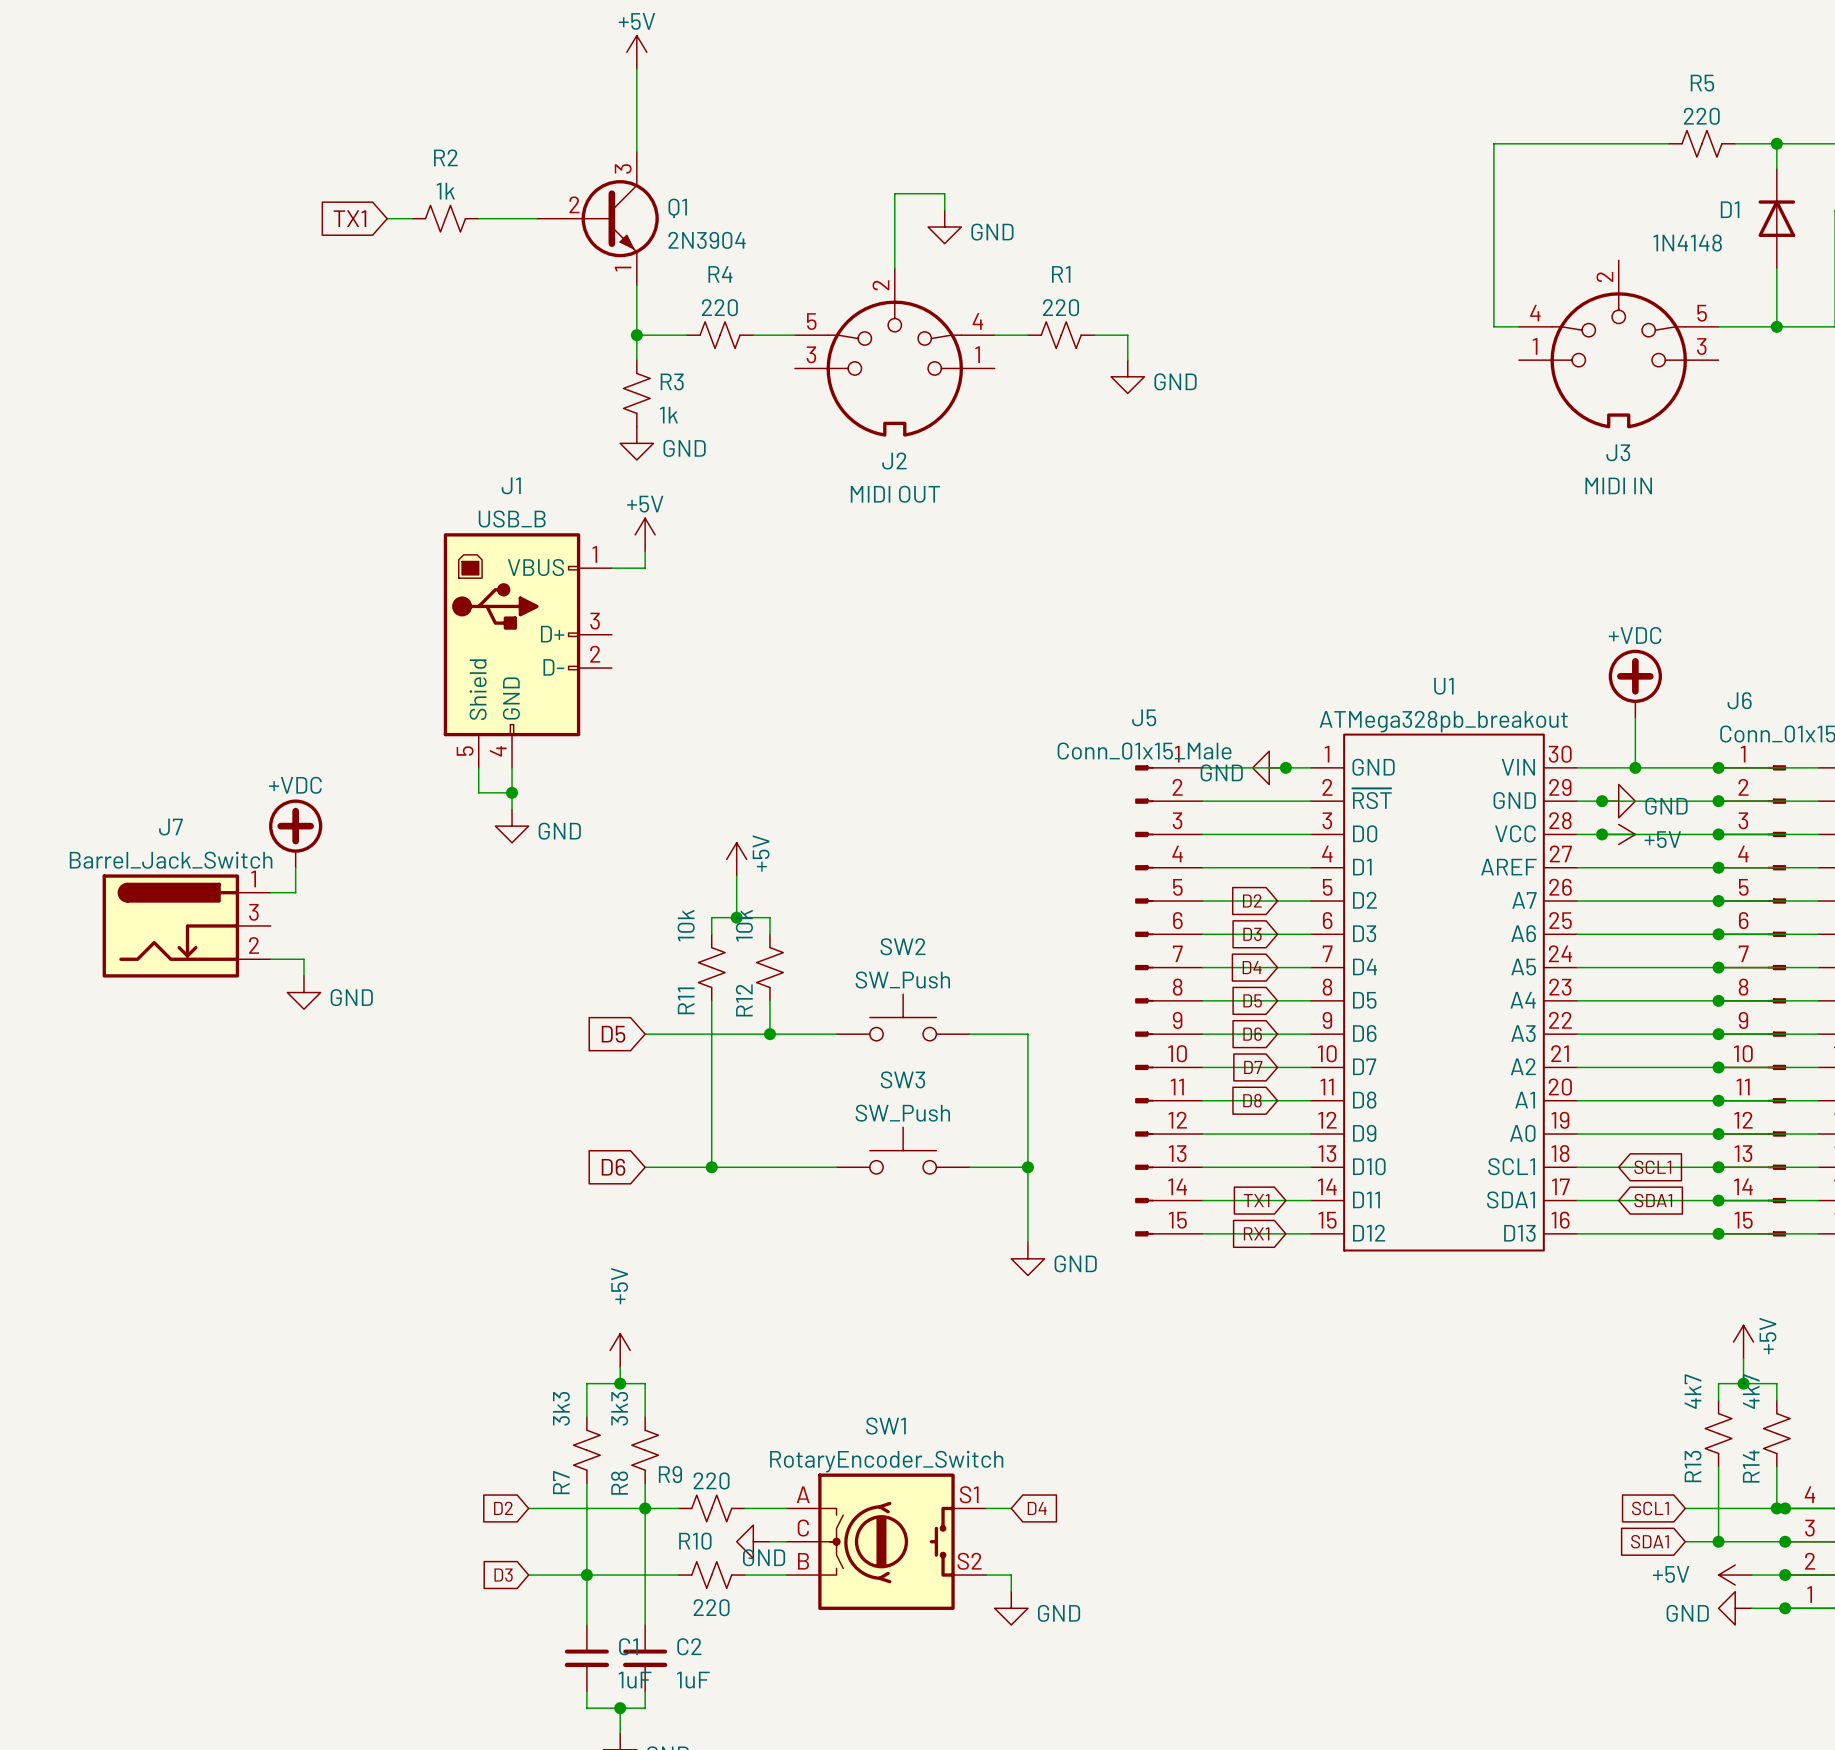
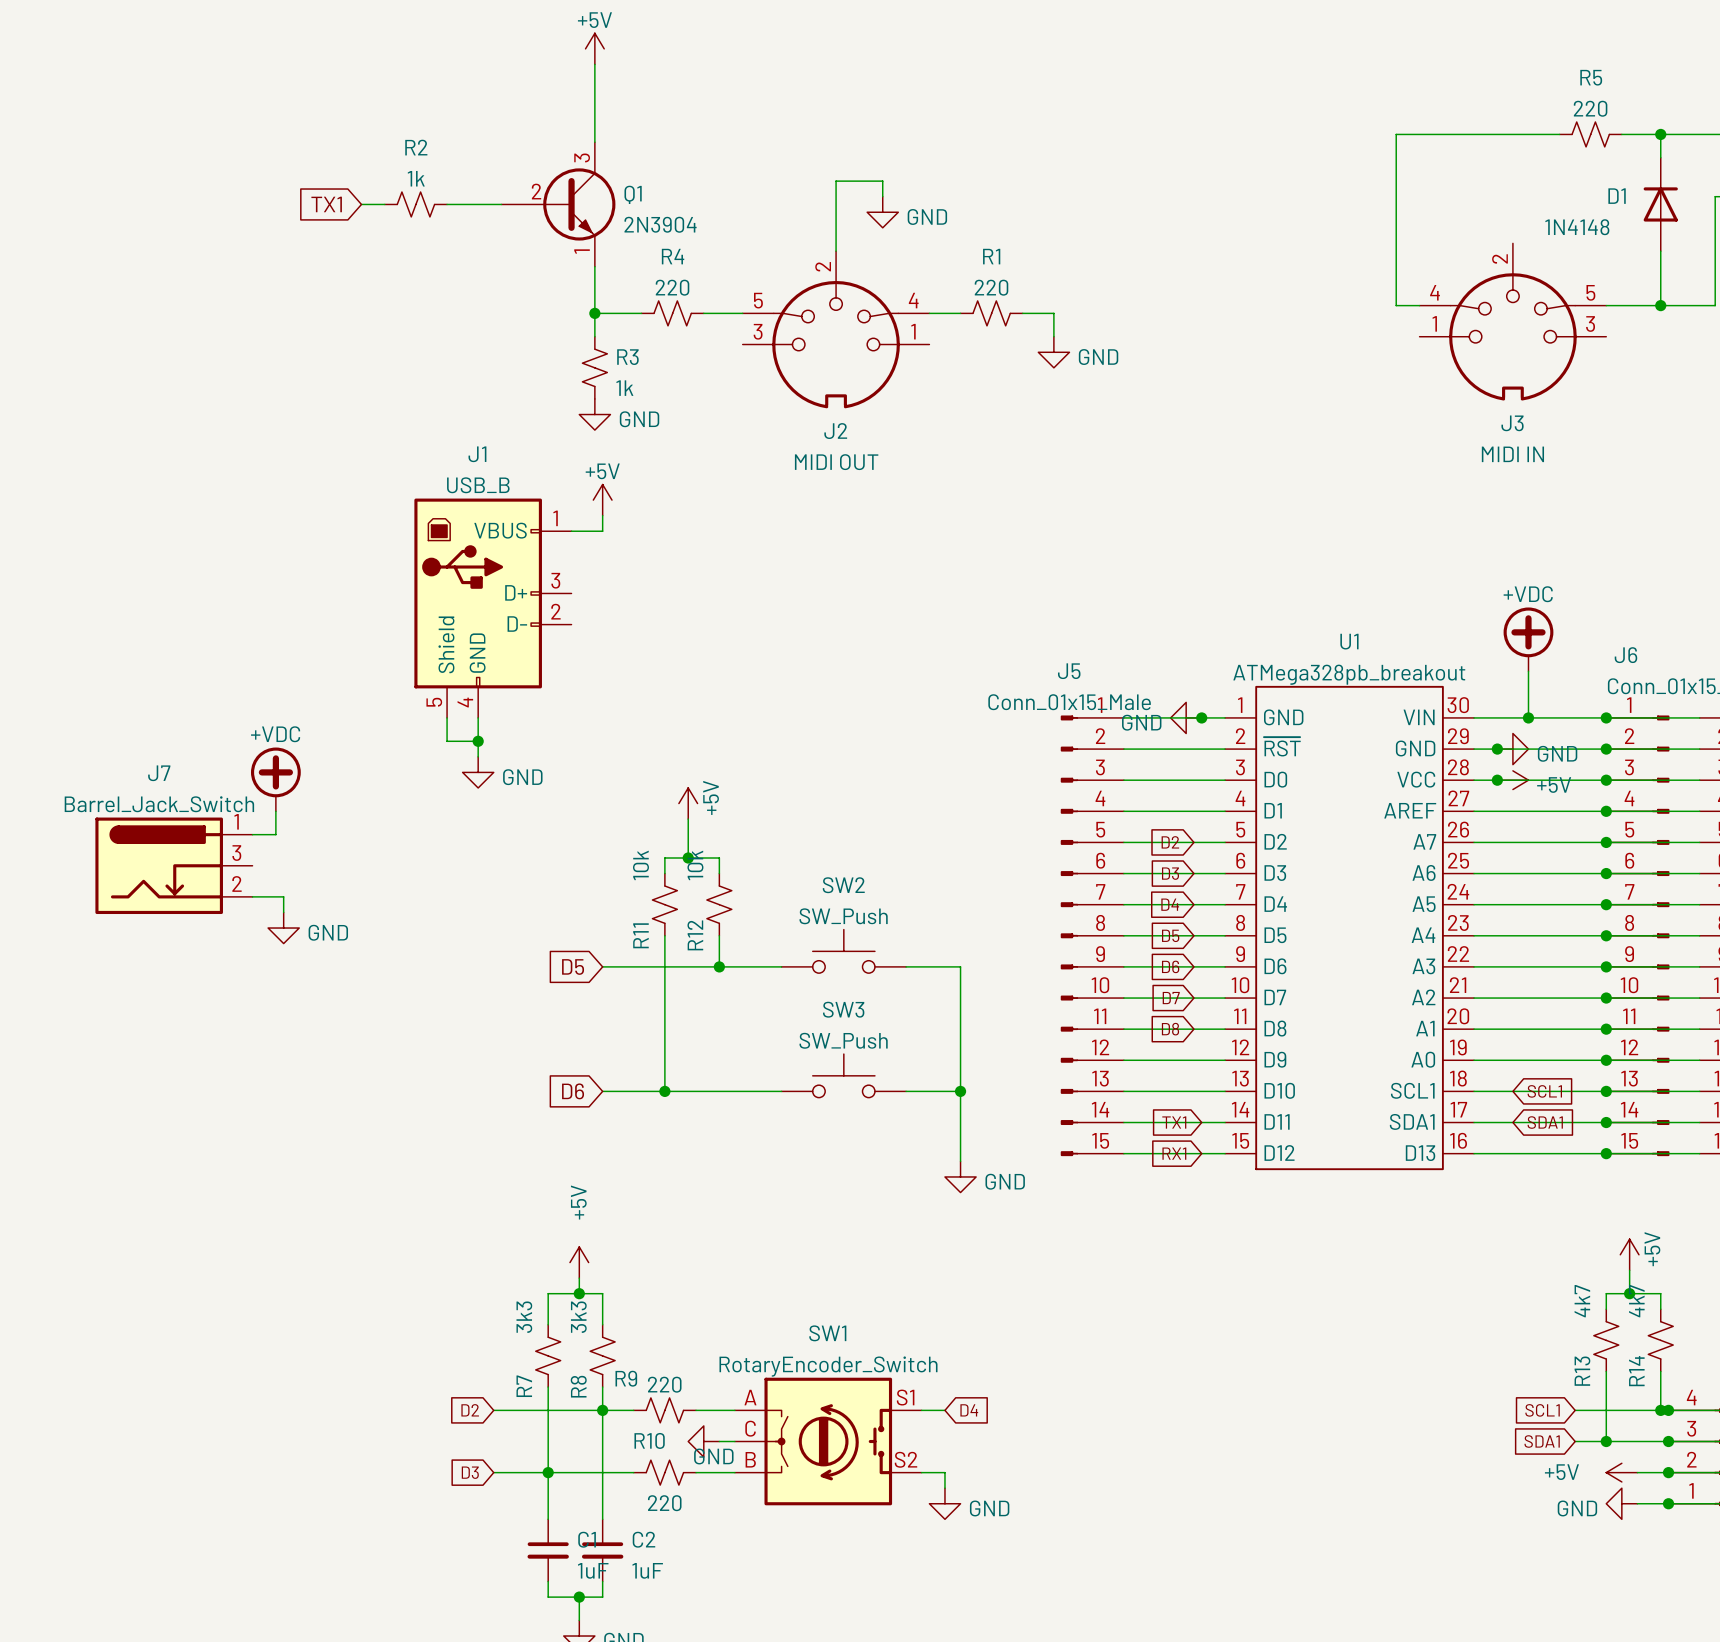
SW1 symbol: [786, 1473, 987, 1610] -> [734, 1377, 922, 1506]

